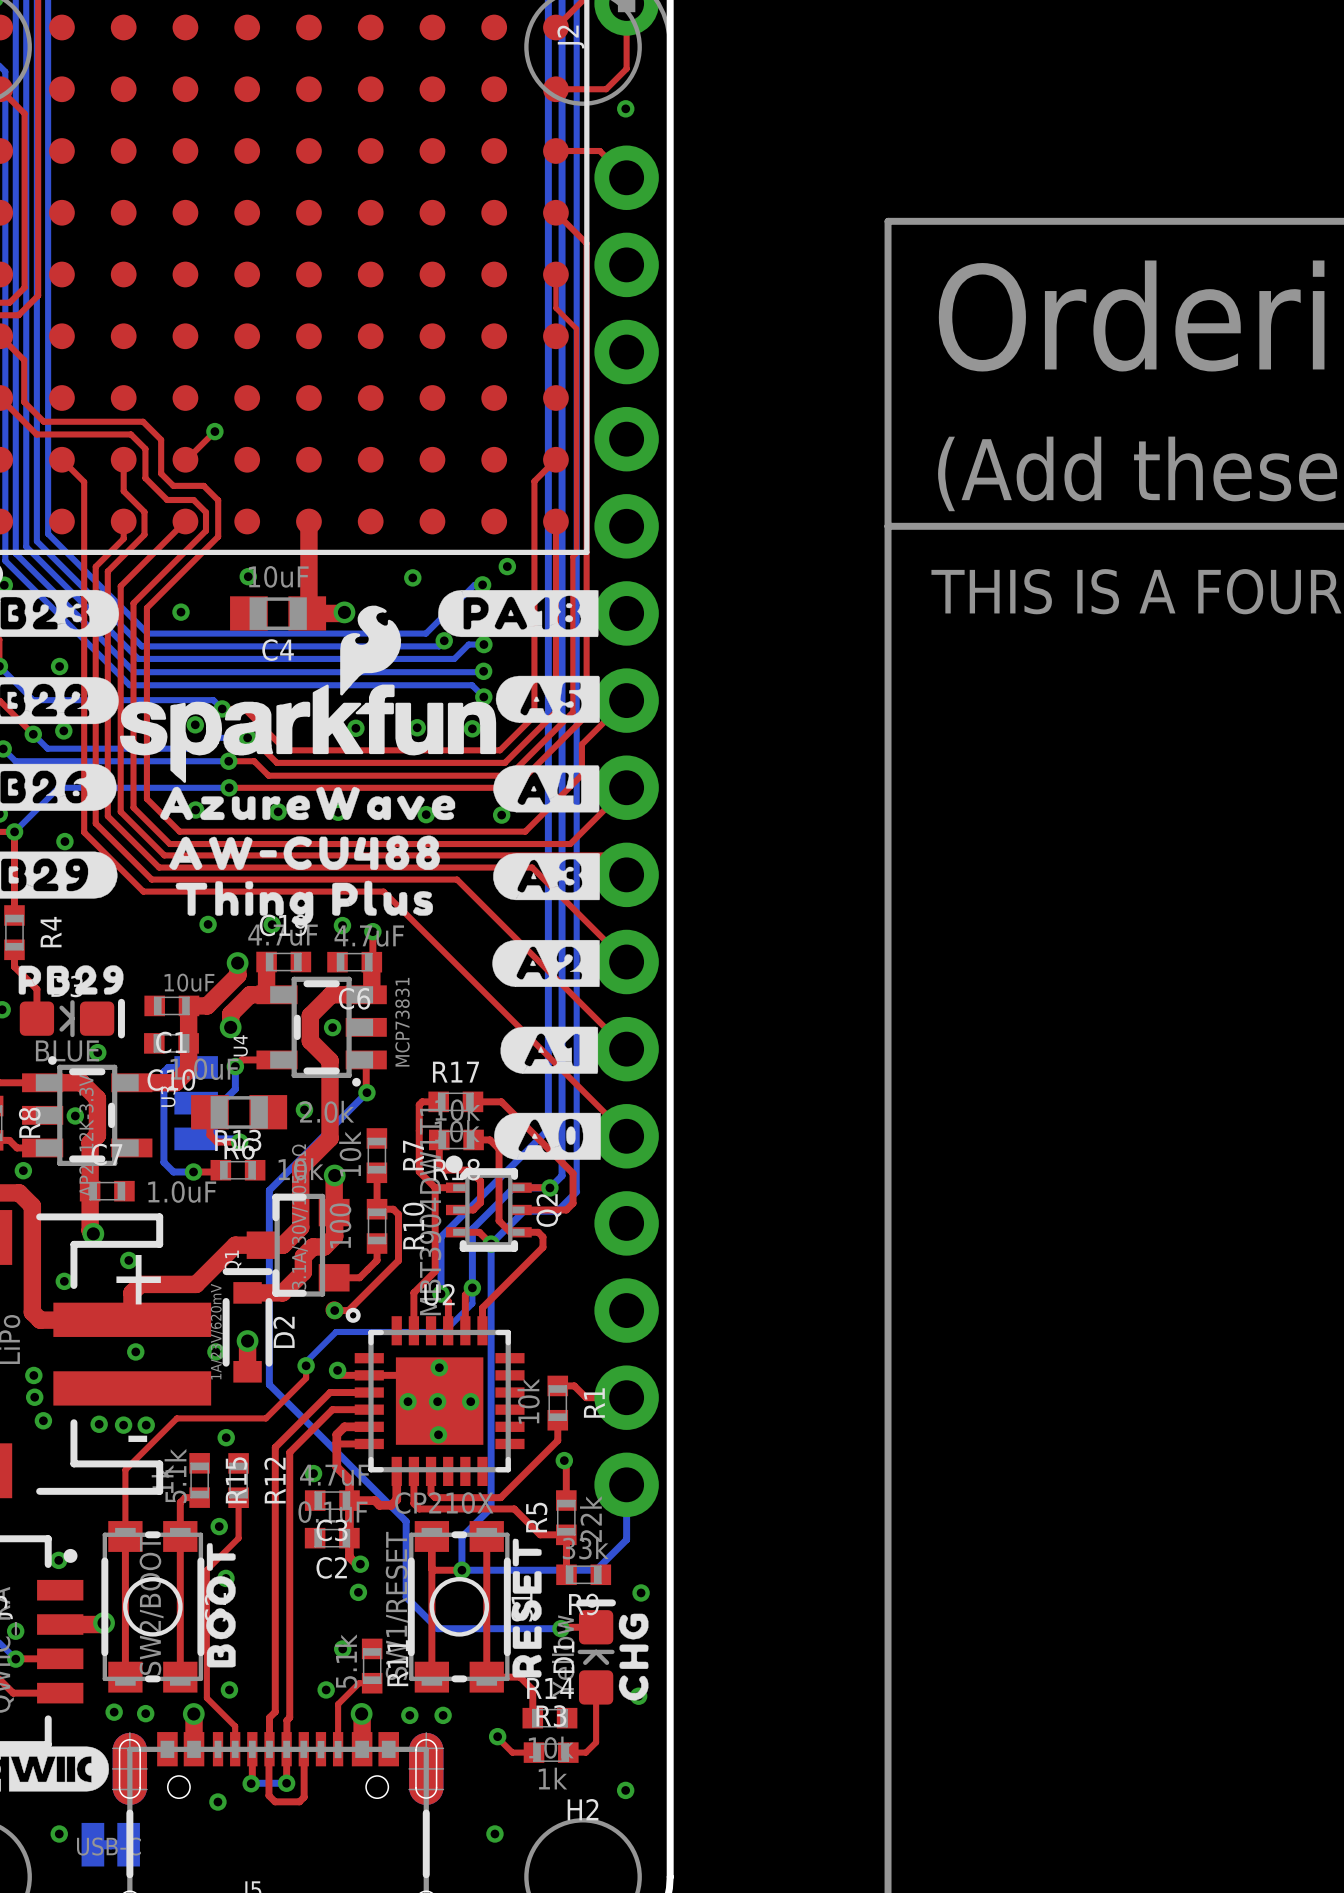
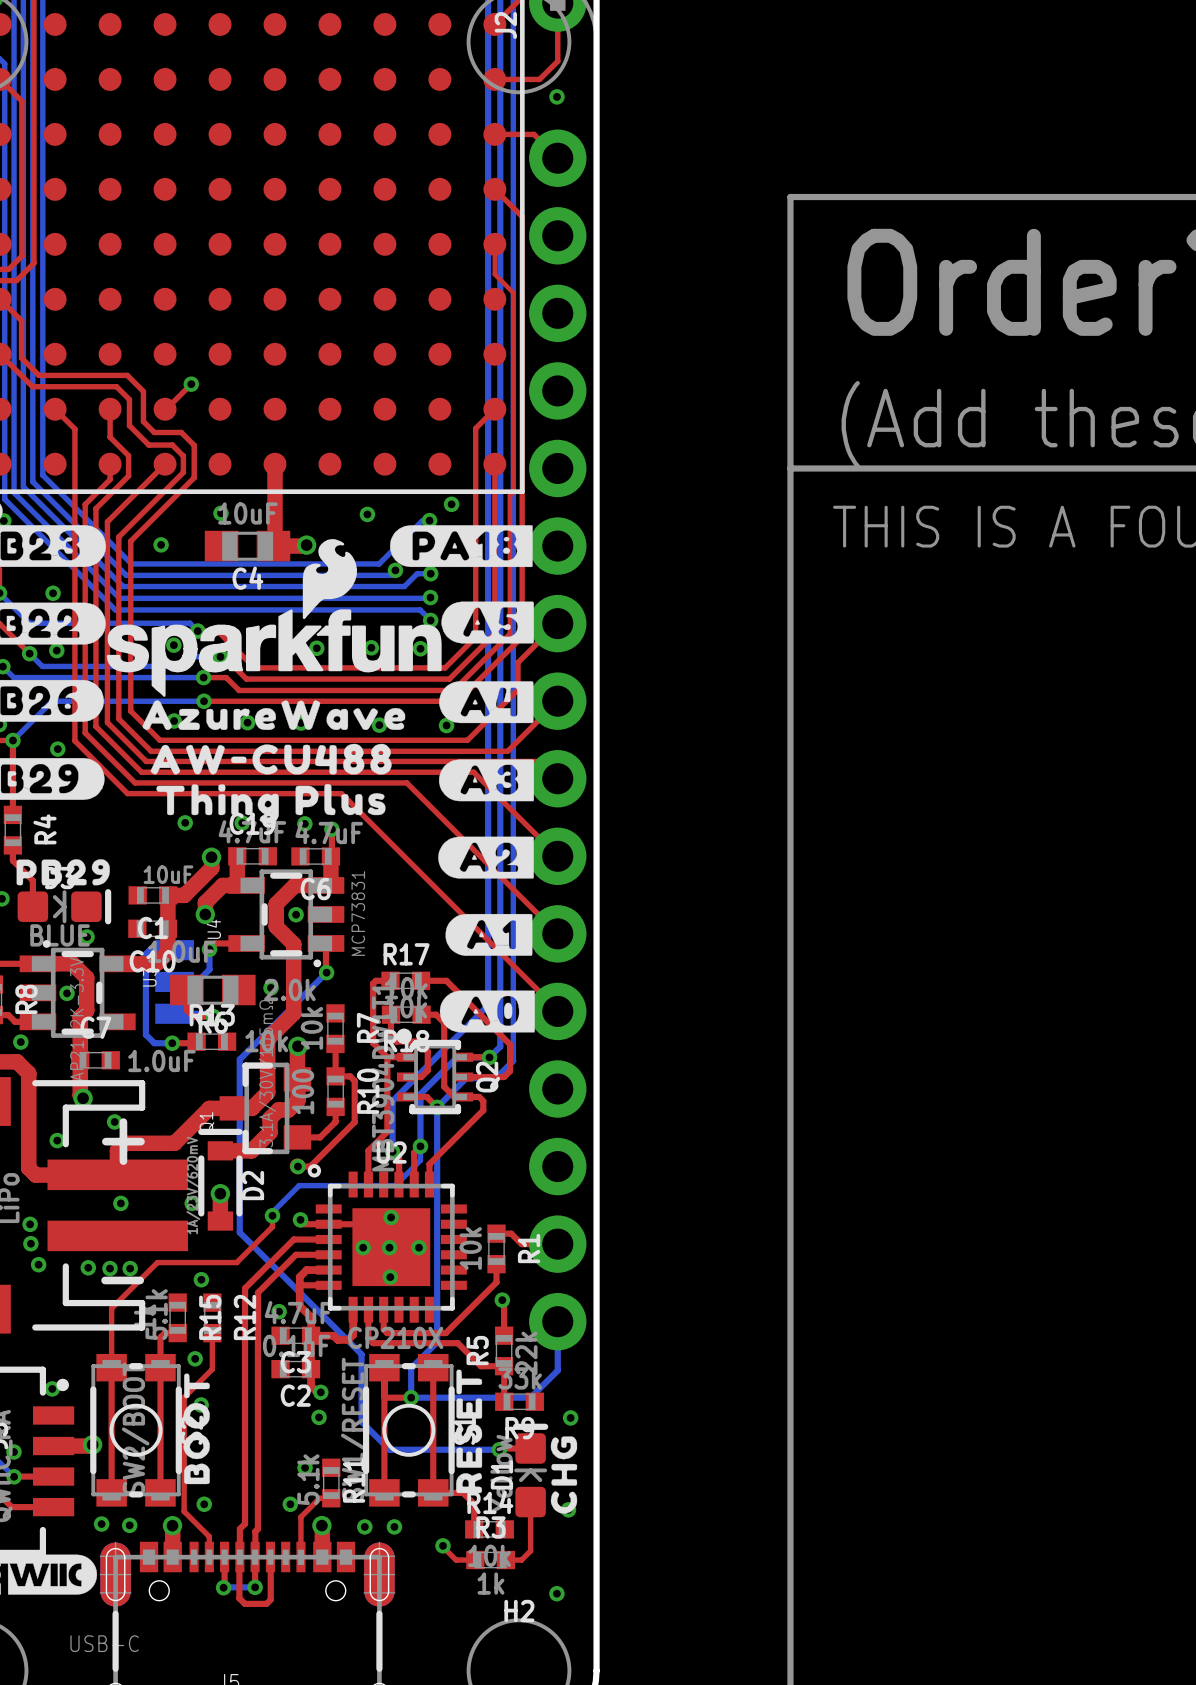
via: (217, 1802) -> none
via: (59, 1833) -> none
via: (494, 1833) -> none
part: (110, 1844) -> none

